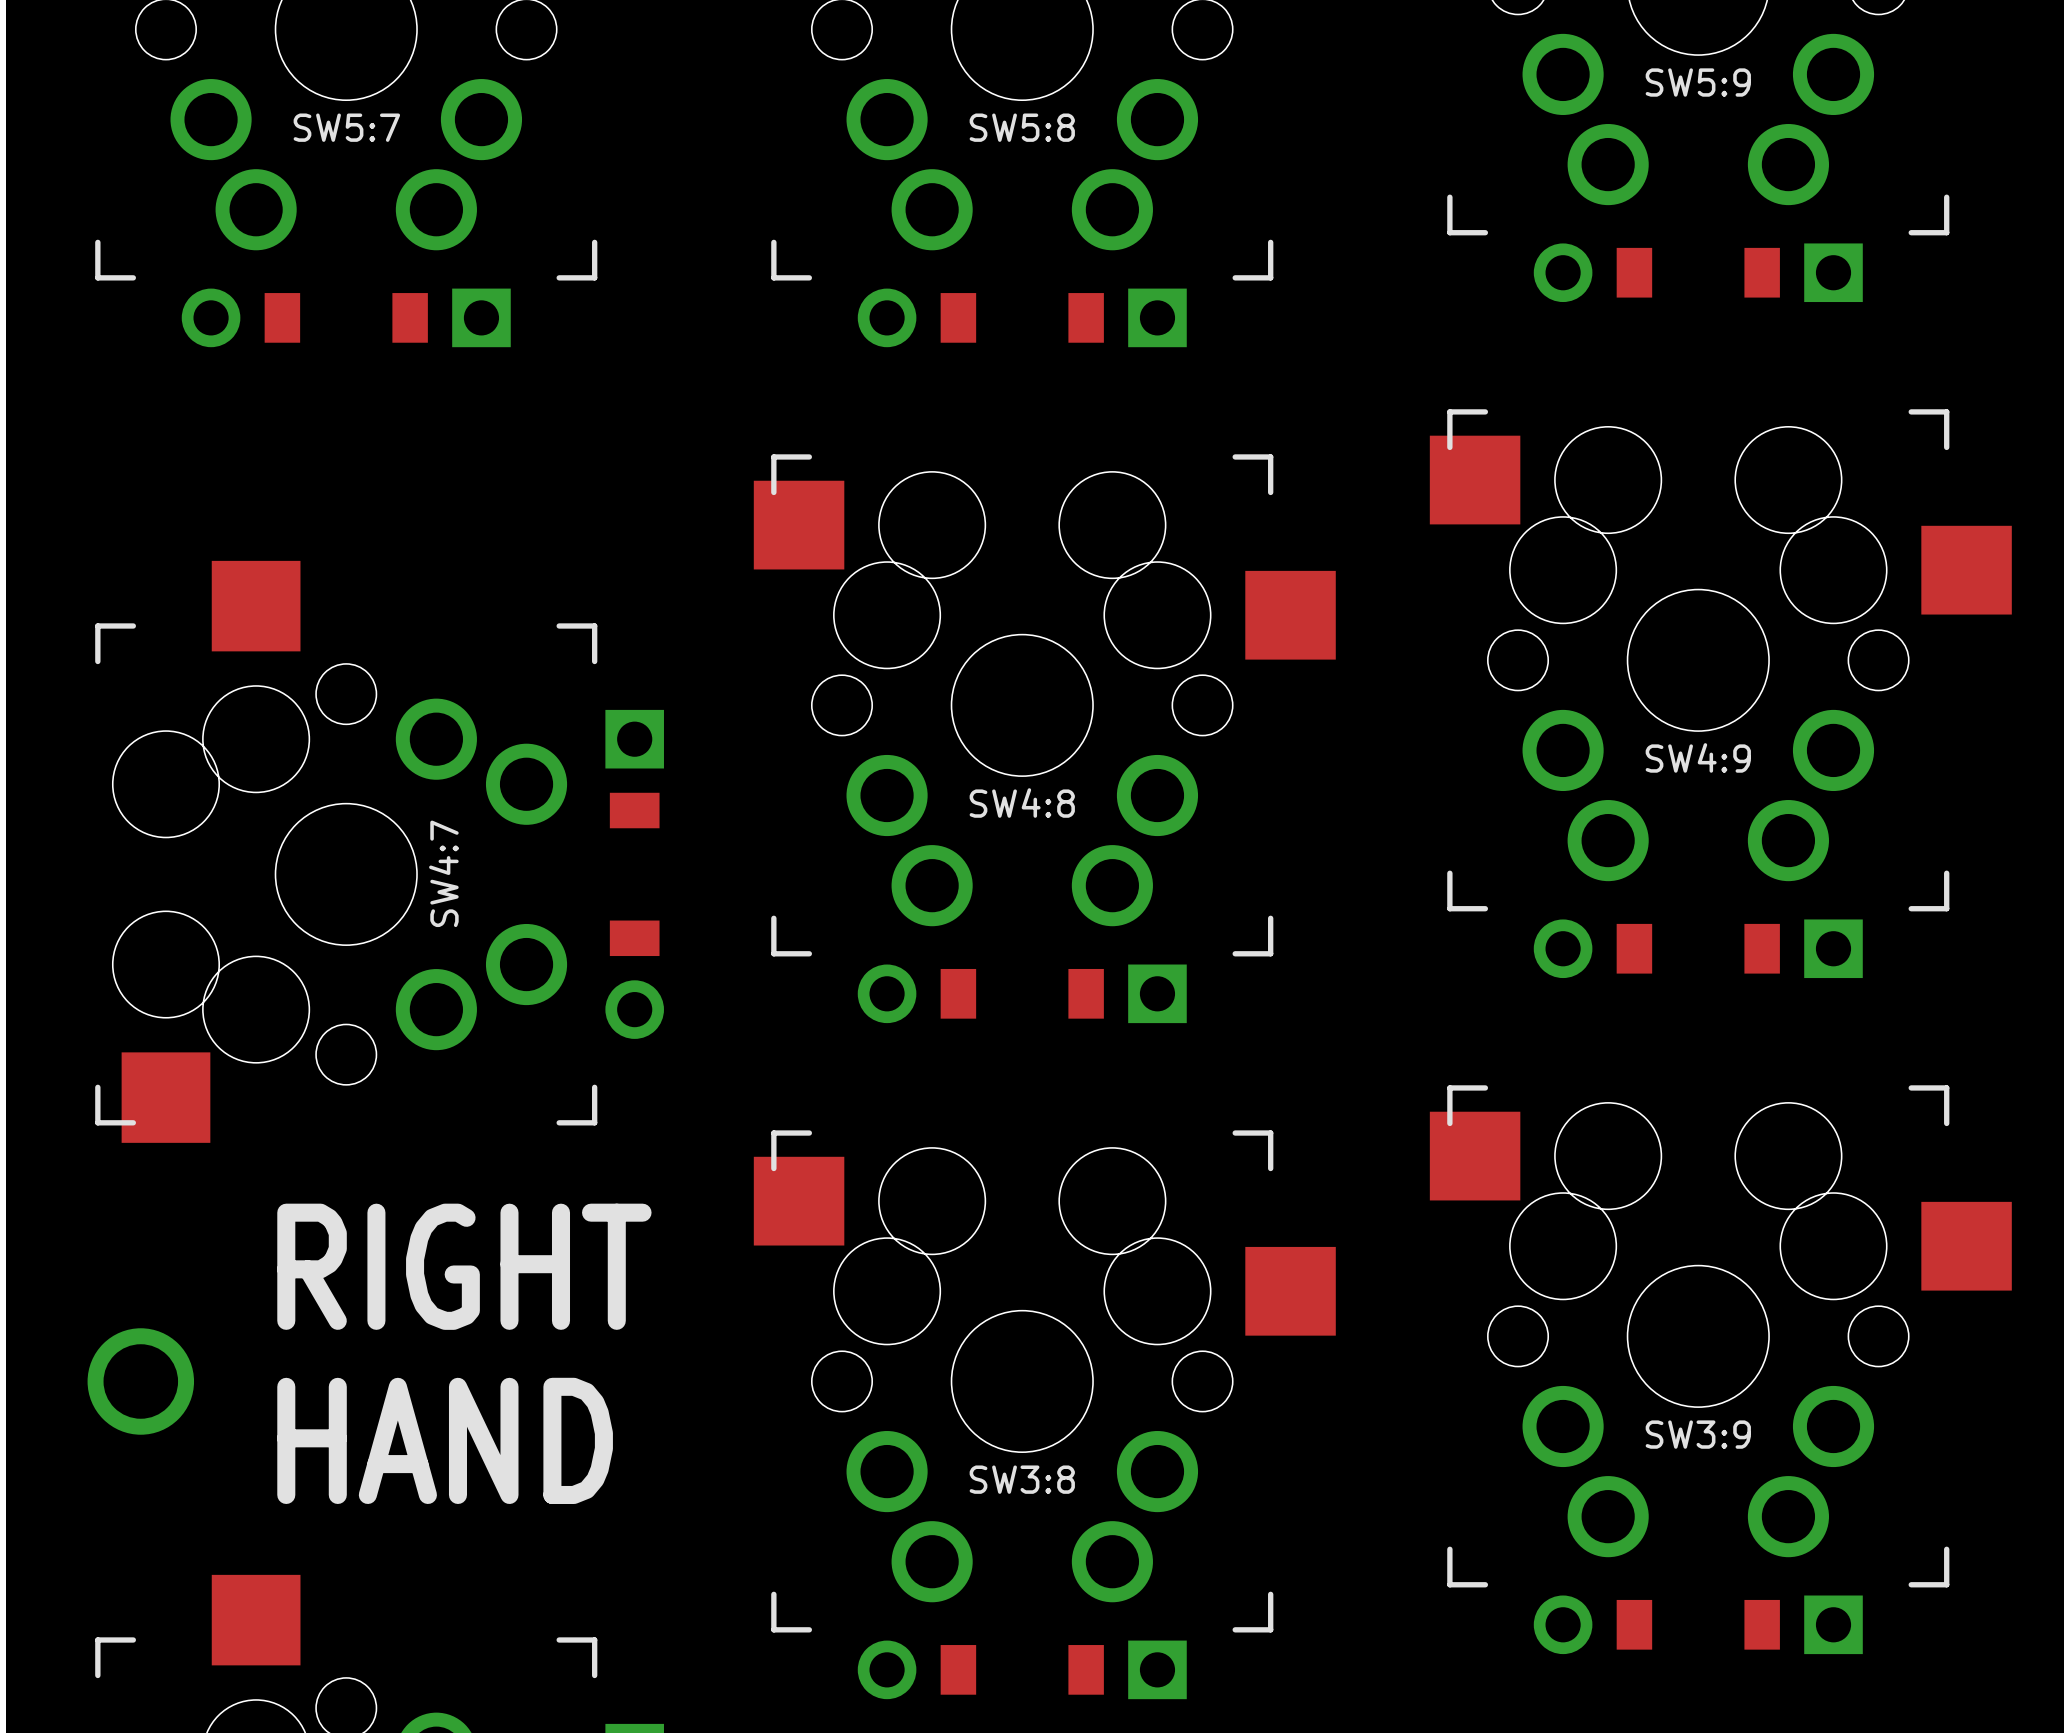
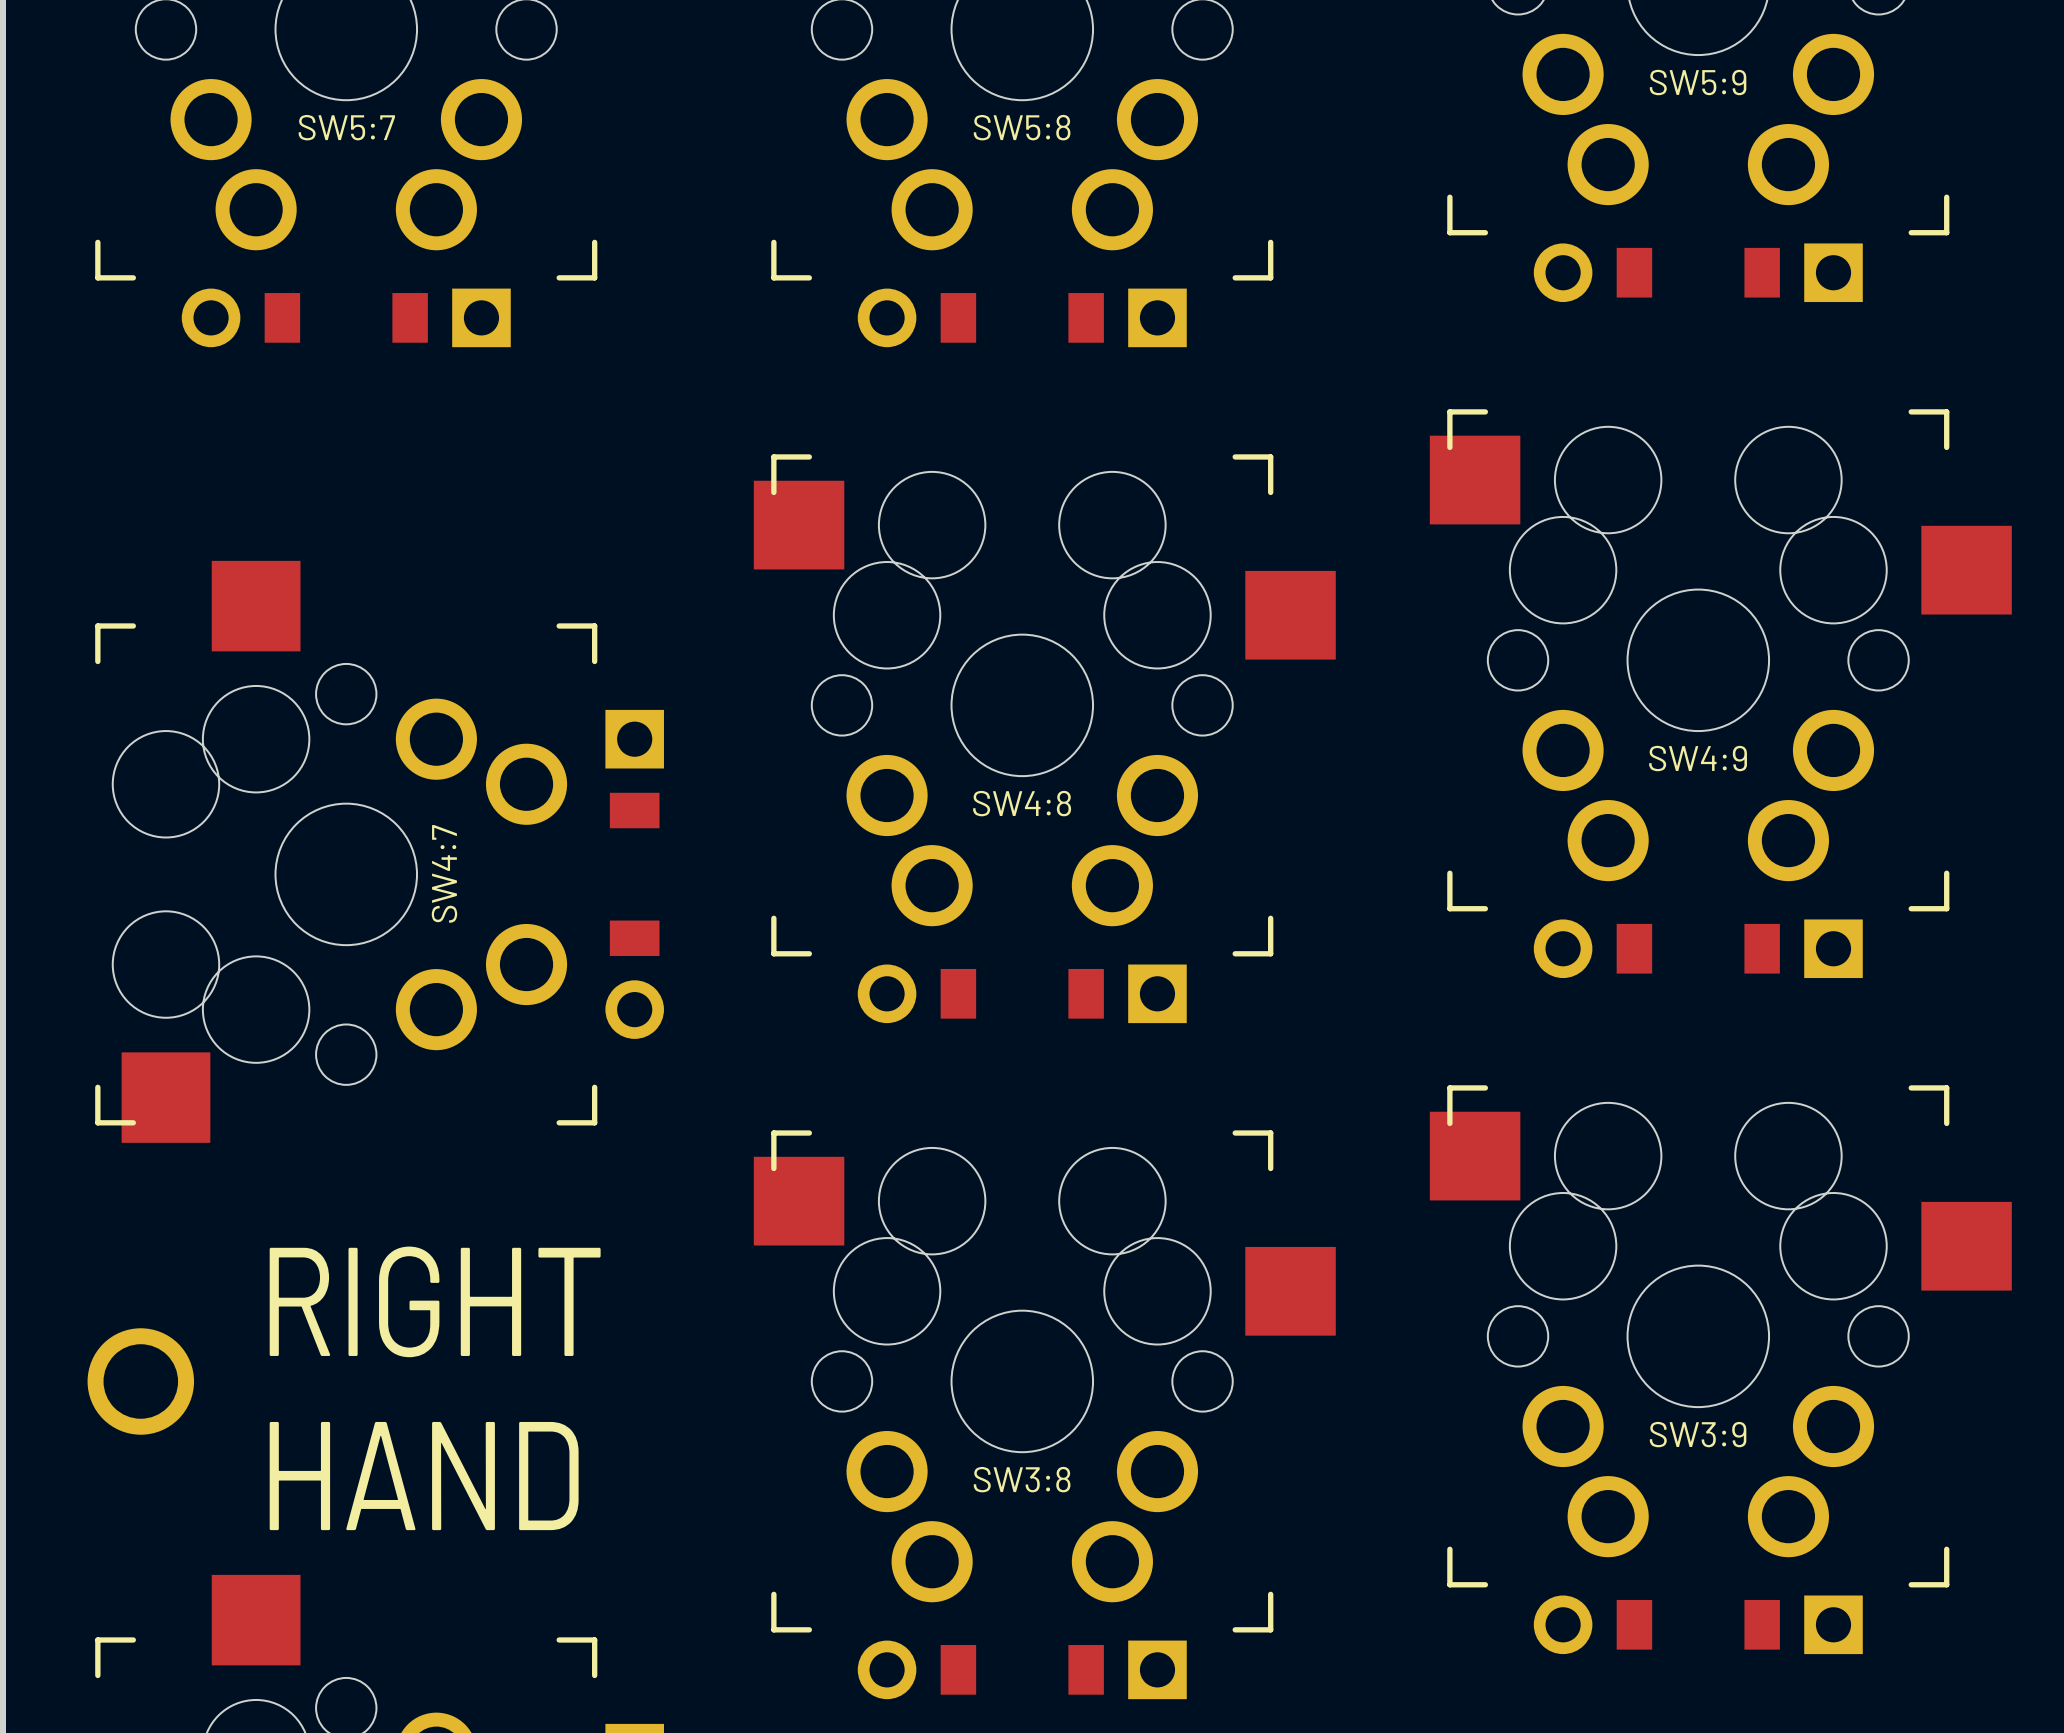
text position: RIGHT (464, 1266) -> RIGHT (435, 1301)
text position: HAND (445, 1440) -> HAND (424, 1476)

